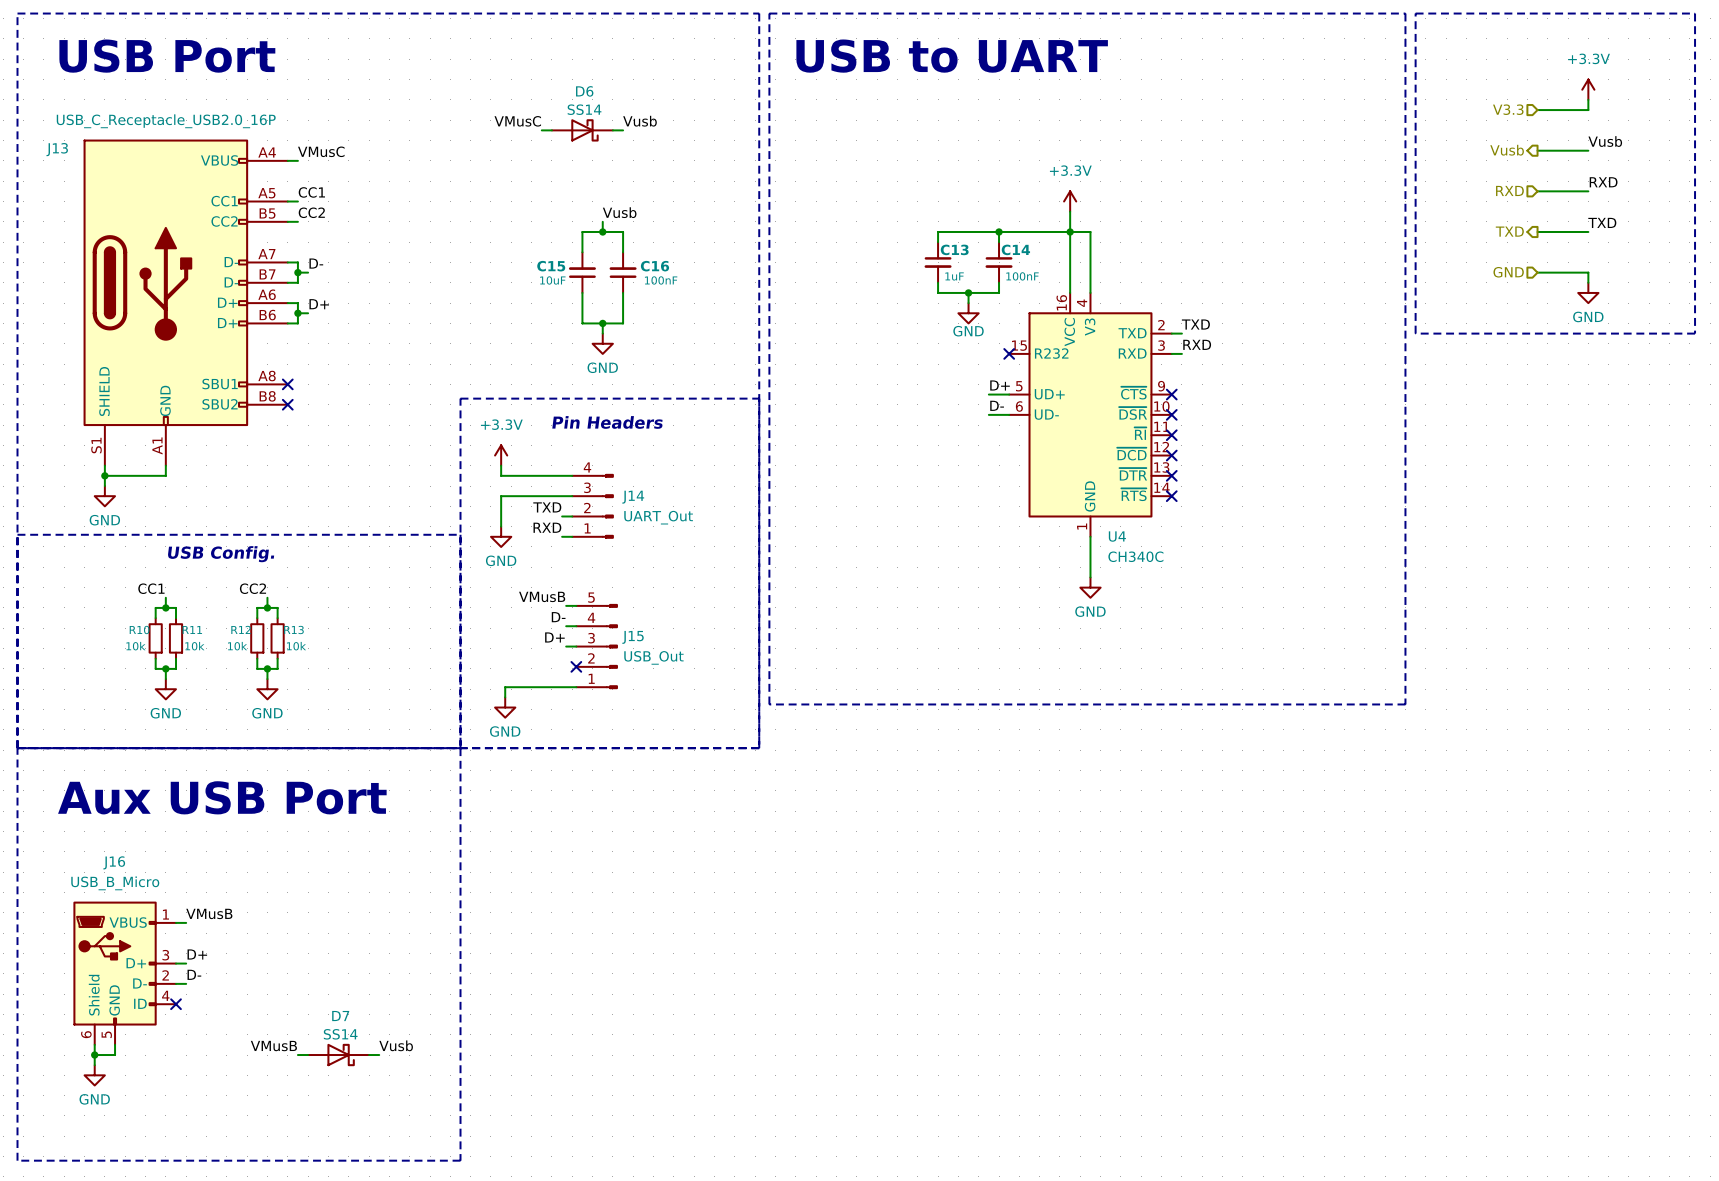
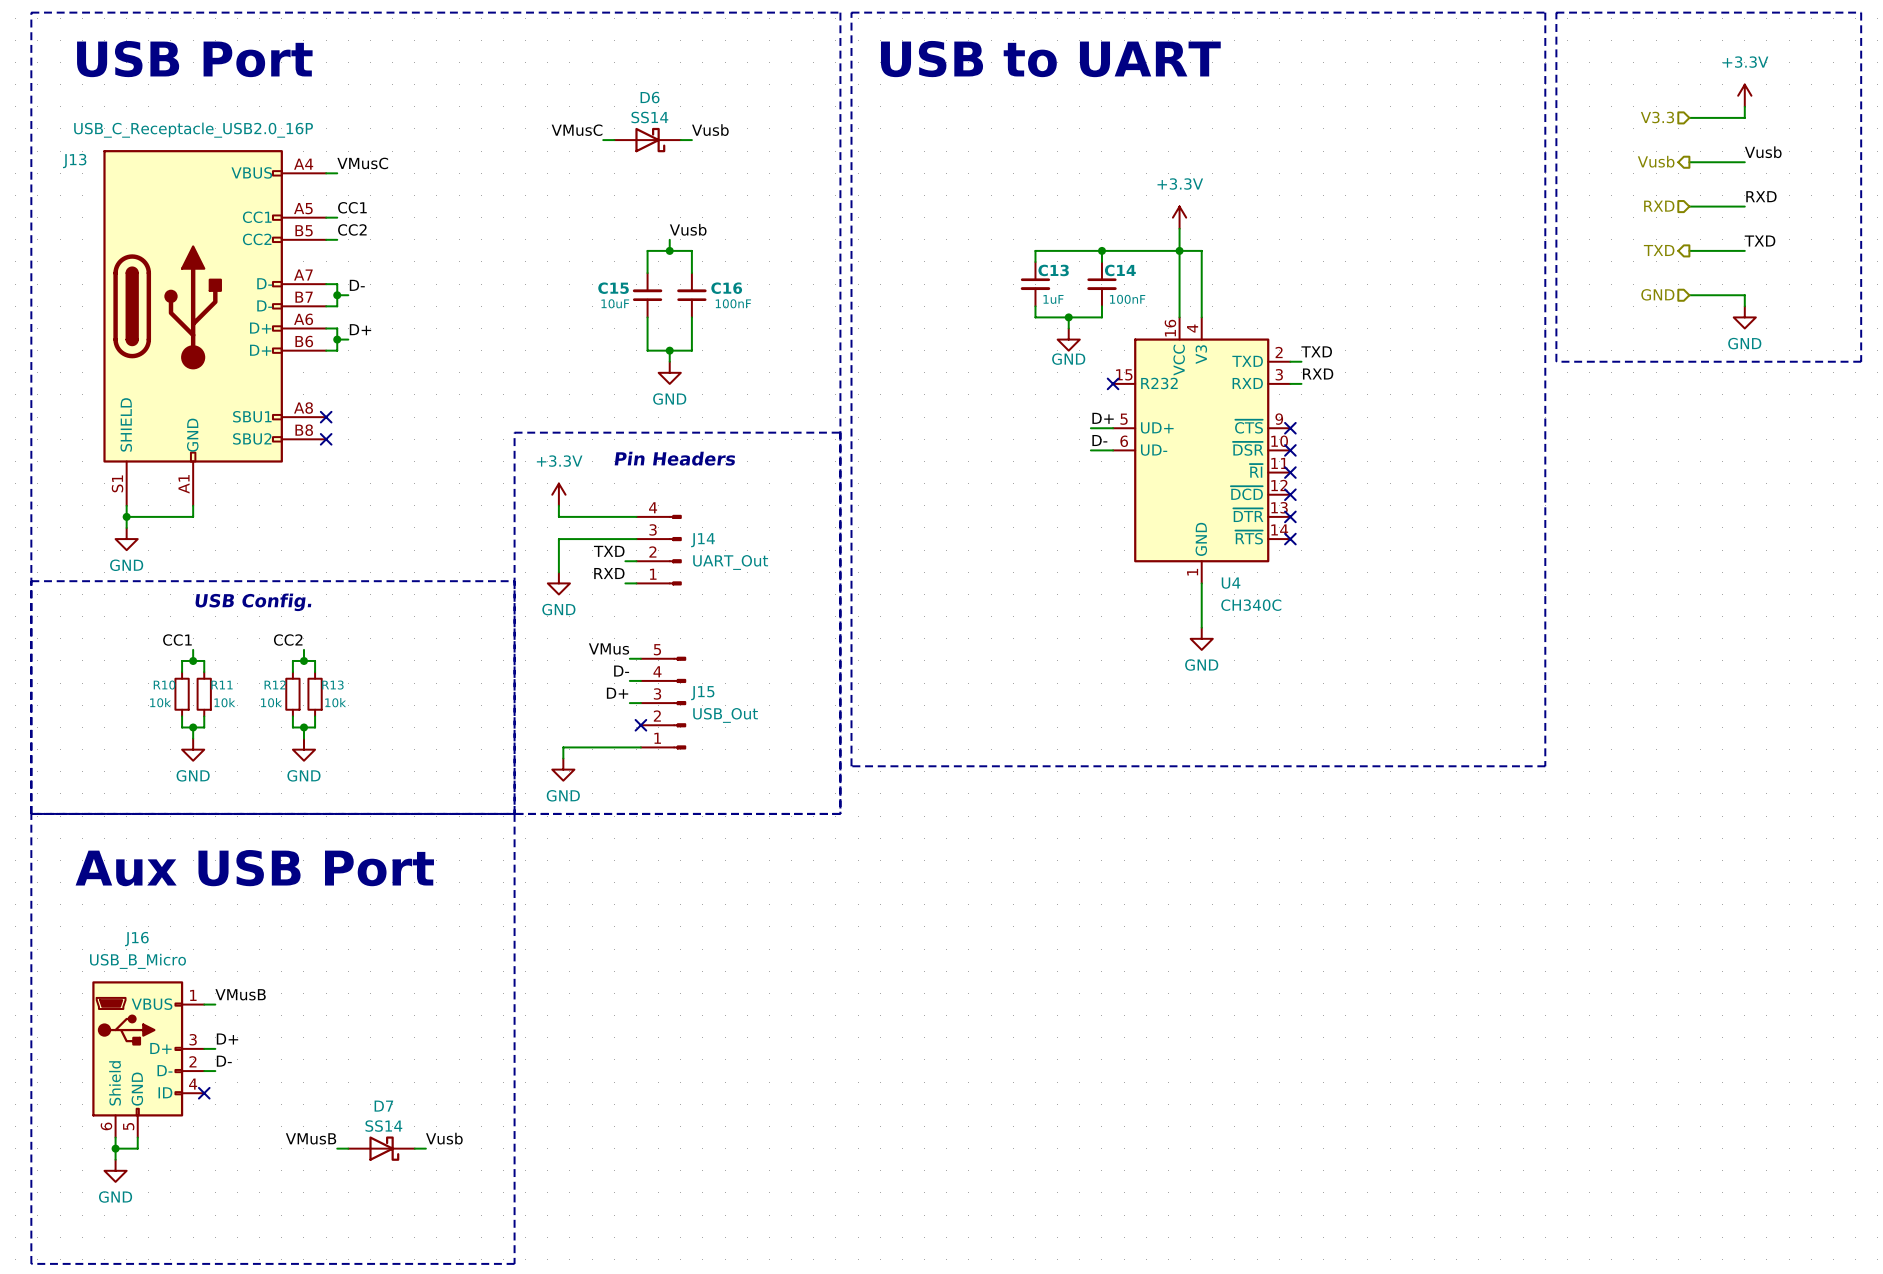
label: VMusB (542, 596) -> VMus (608, 648)

